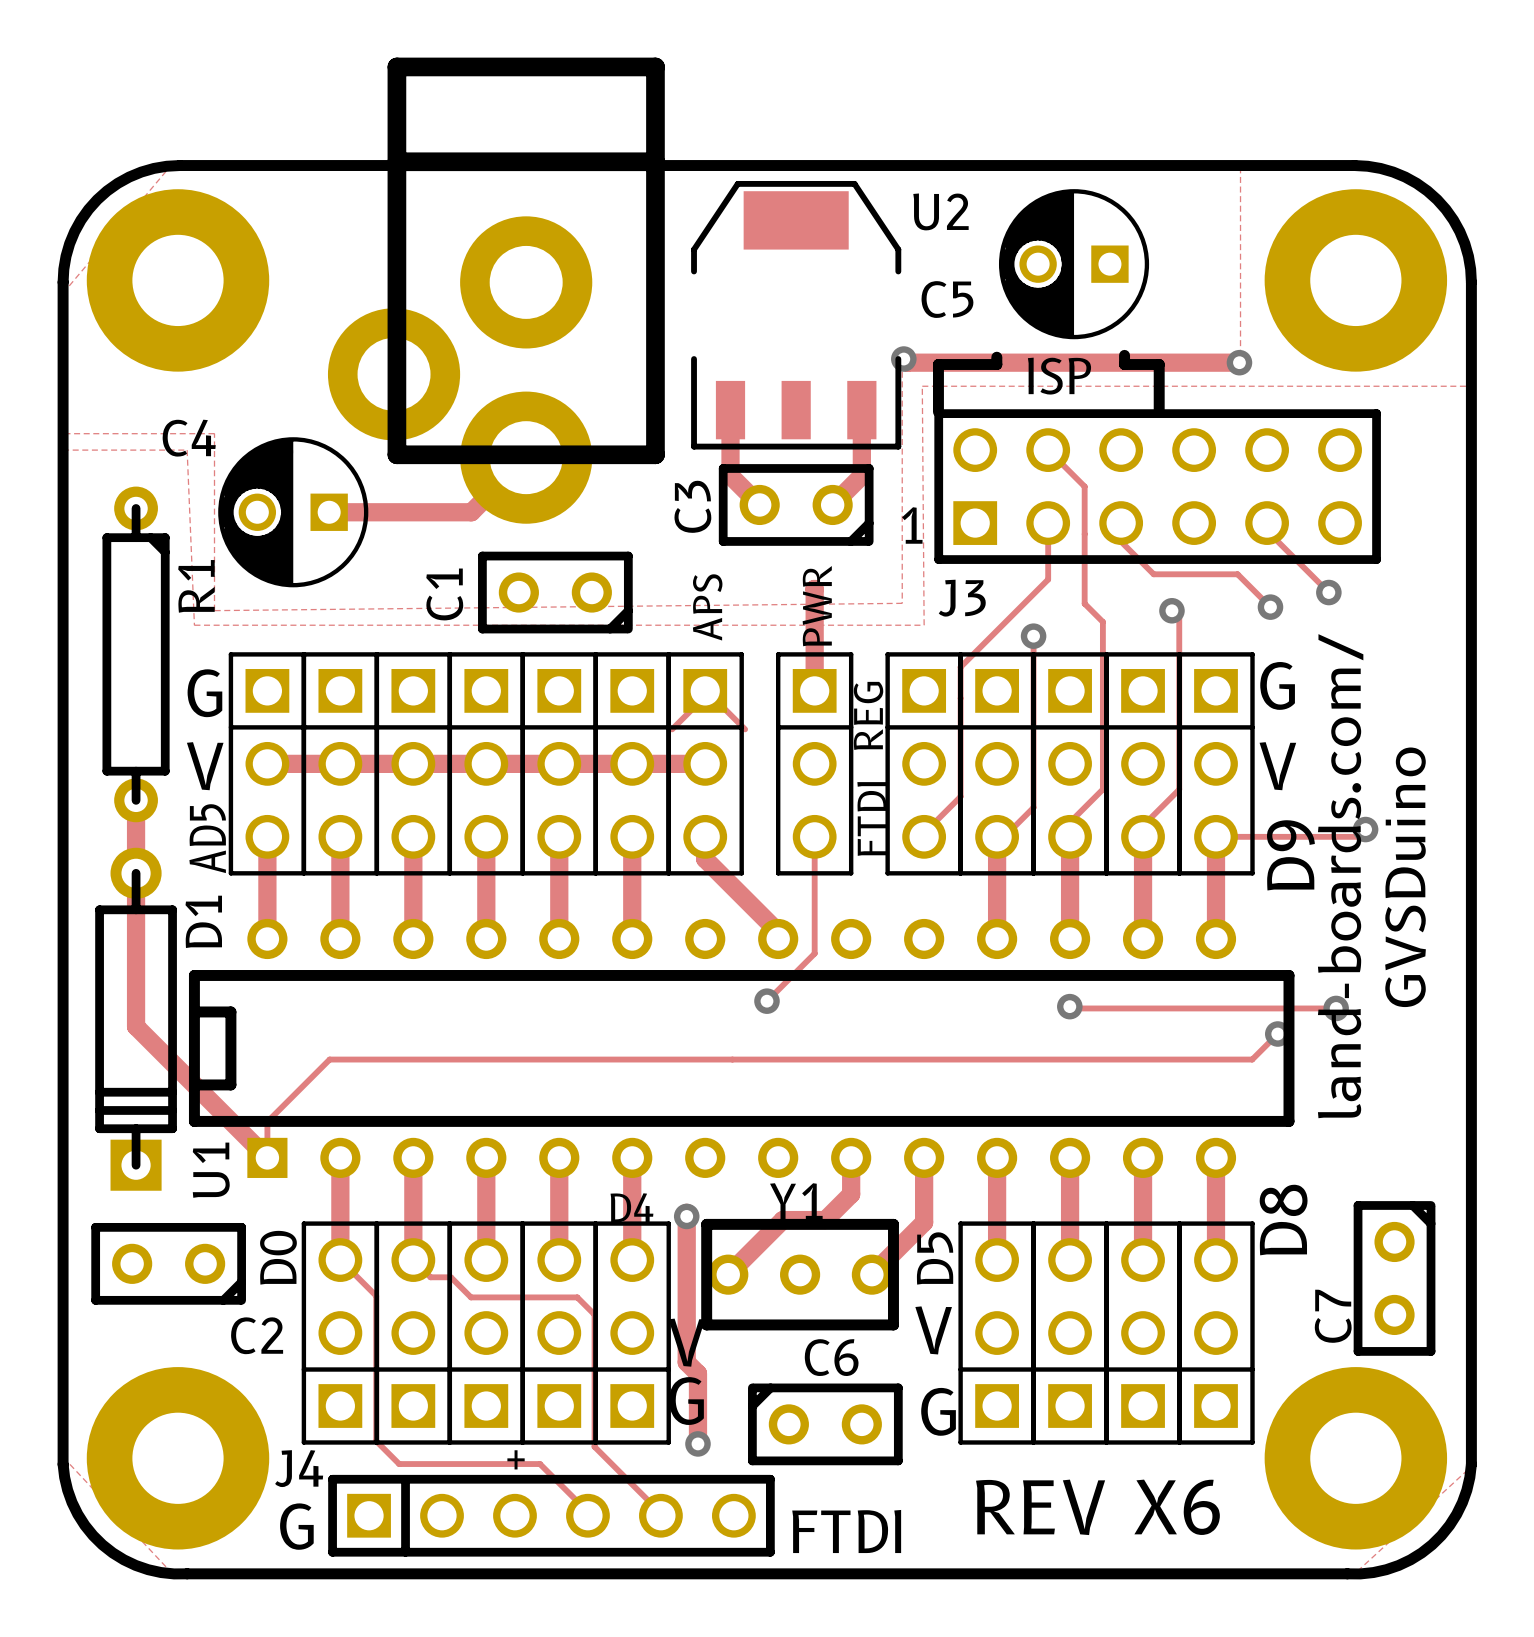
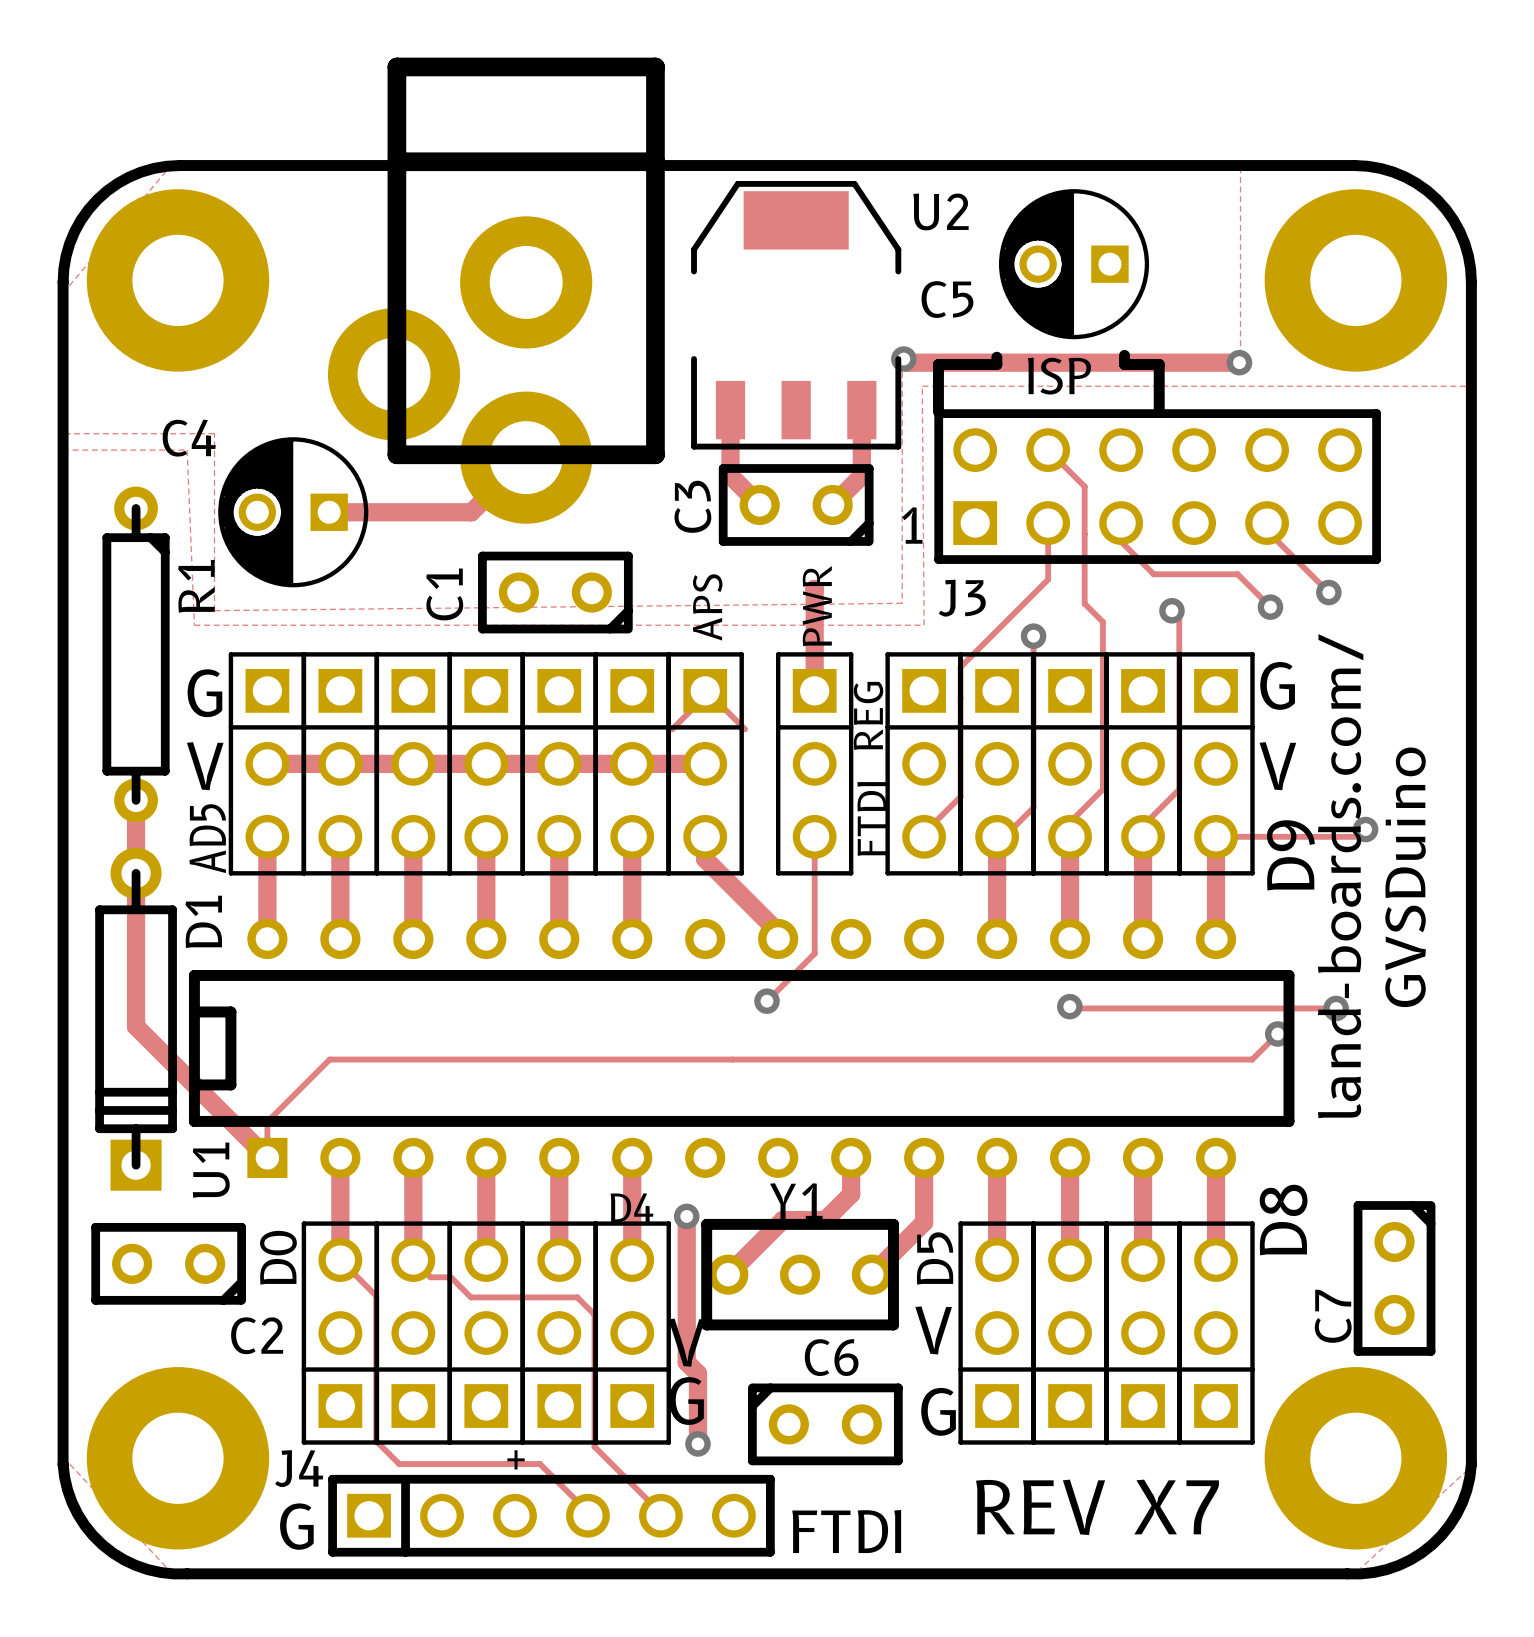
text: REV X6 (1097, 1507) -> REV X7 (1097, 1507)

